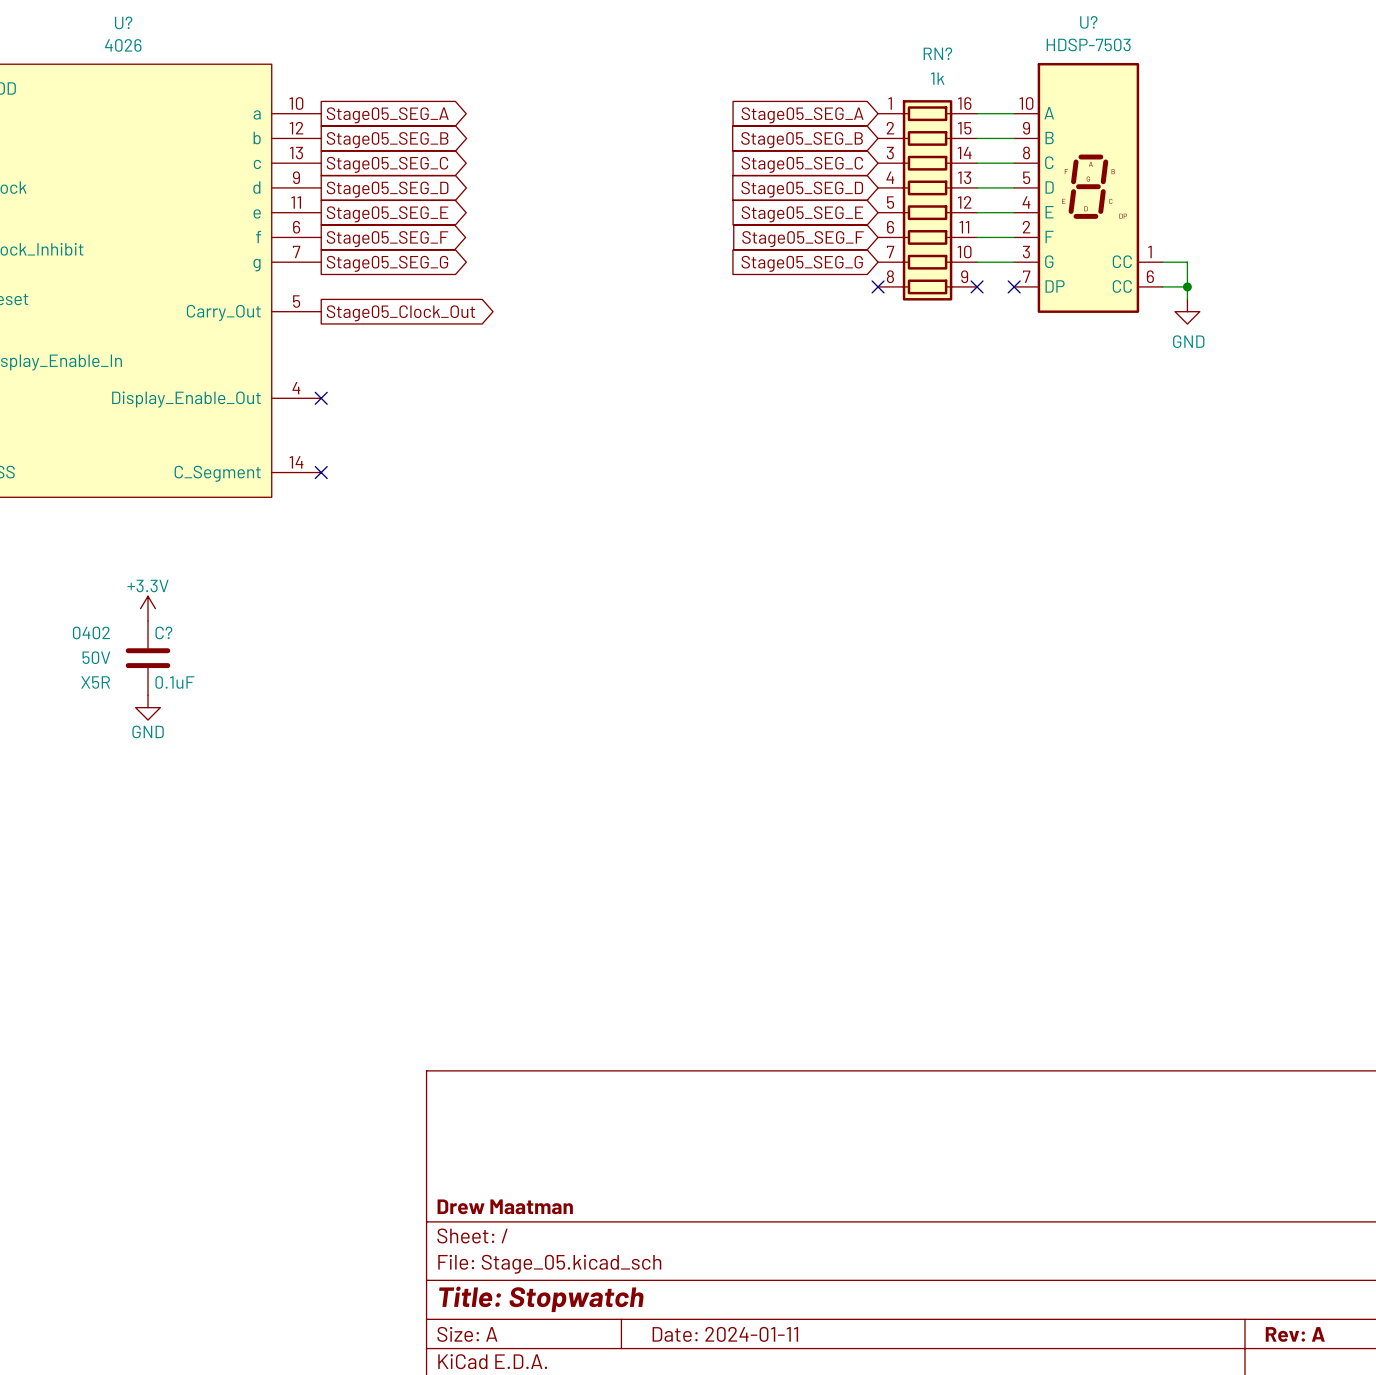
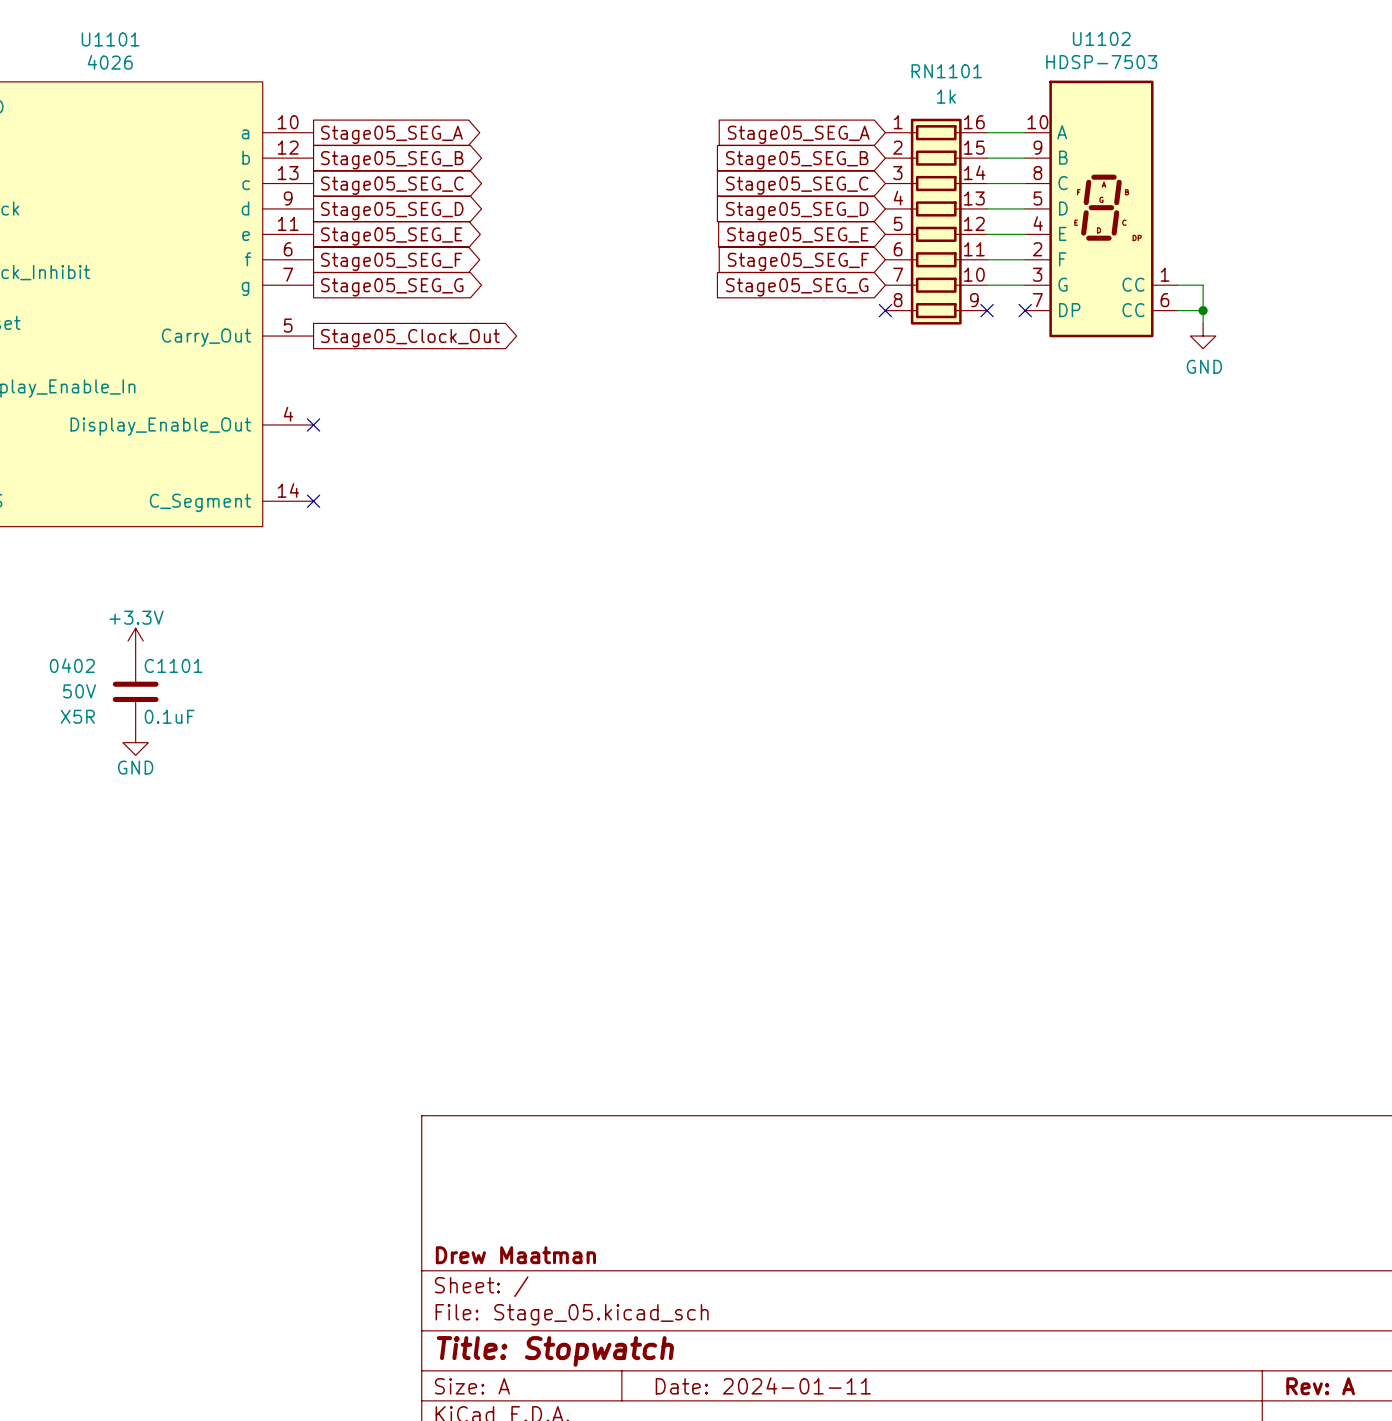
U? name: U? (123, 22) -> U1101 (110, 39)
U? name: U? (1088, 22) -> U1102 (1101, 38)
RN? name: RN? (937, 53) -> RN1101 (946, 71)
C? name: C? (163, 632) -> C1101 (173, 665)

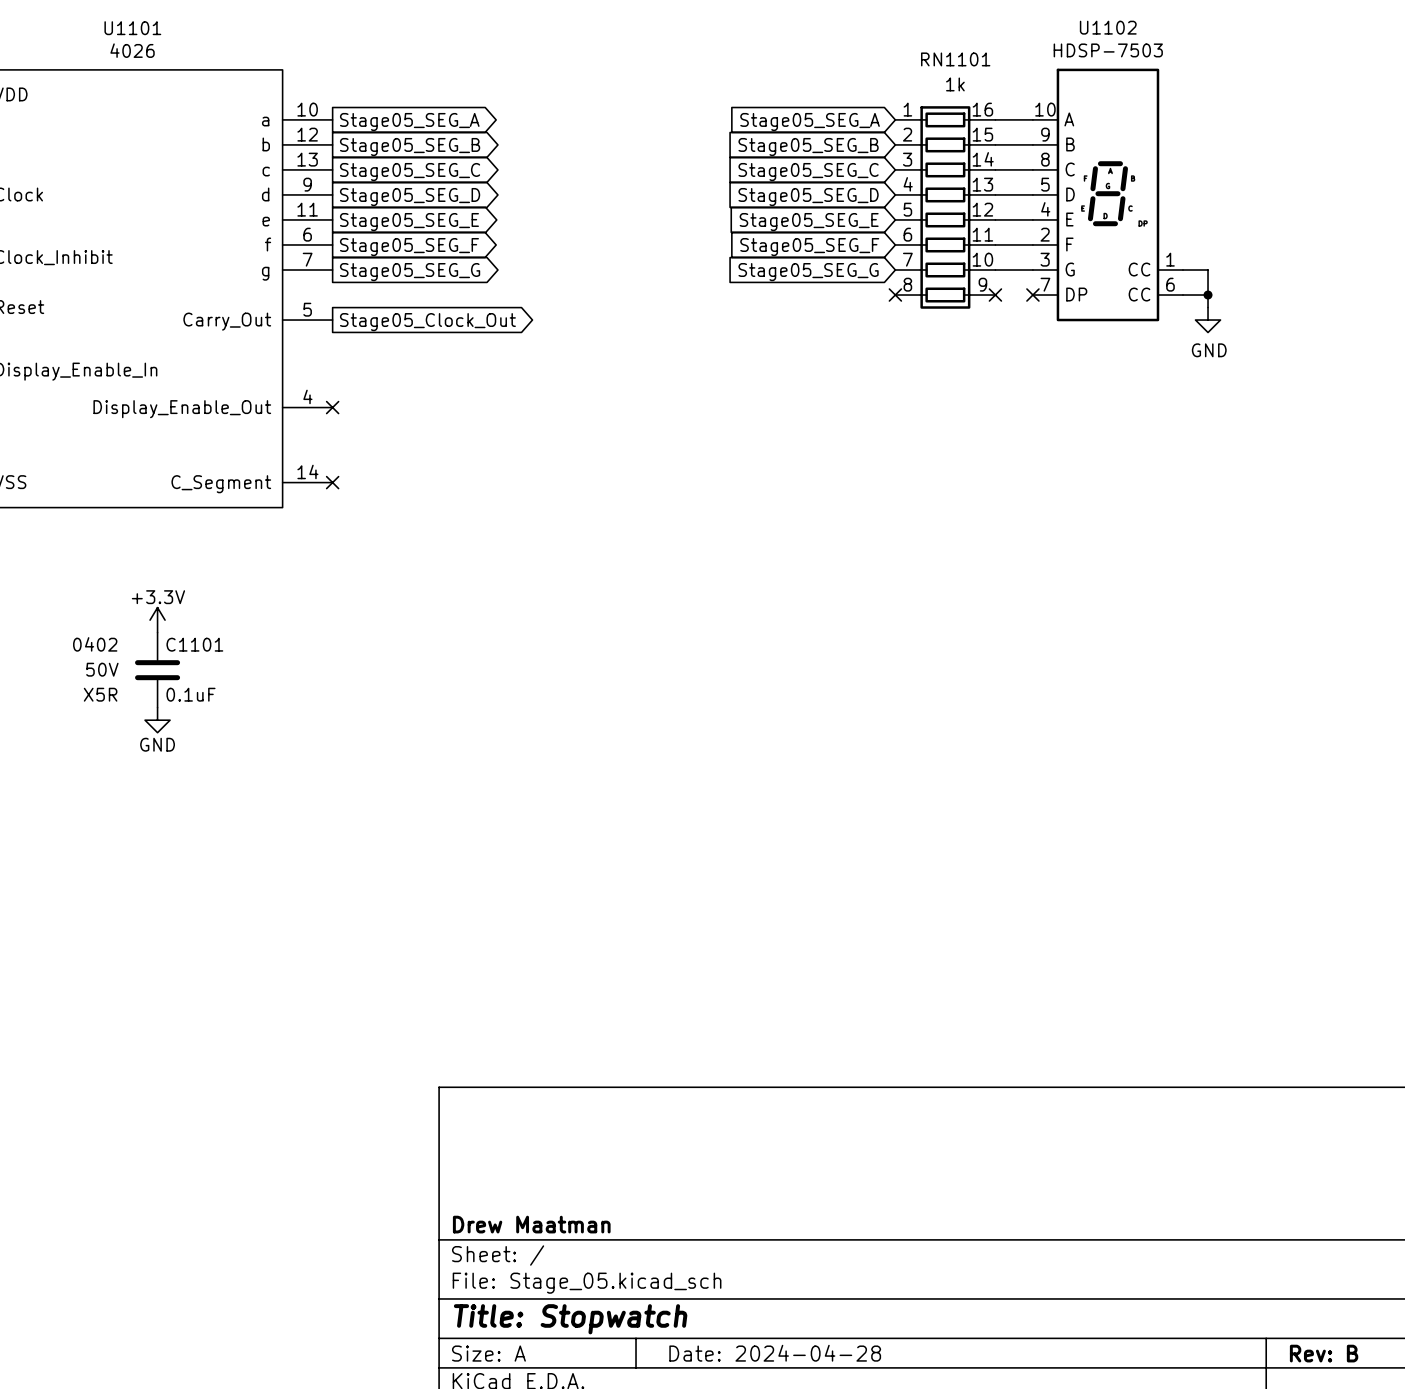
title block: Date: 2024-01-11 (763, 1385) -> Date: 2024-04-28 (775, 1353)
title block: Rev: A (1320, 1386) -> Rev: B (1324, 1353)

